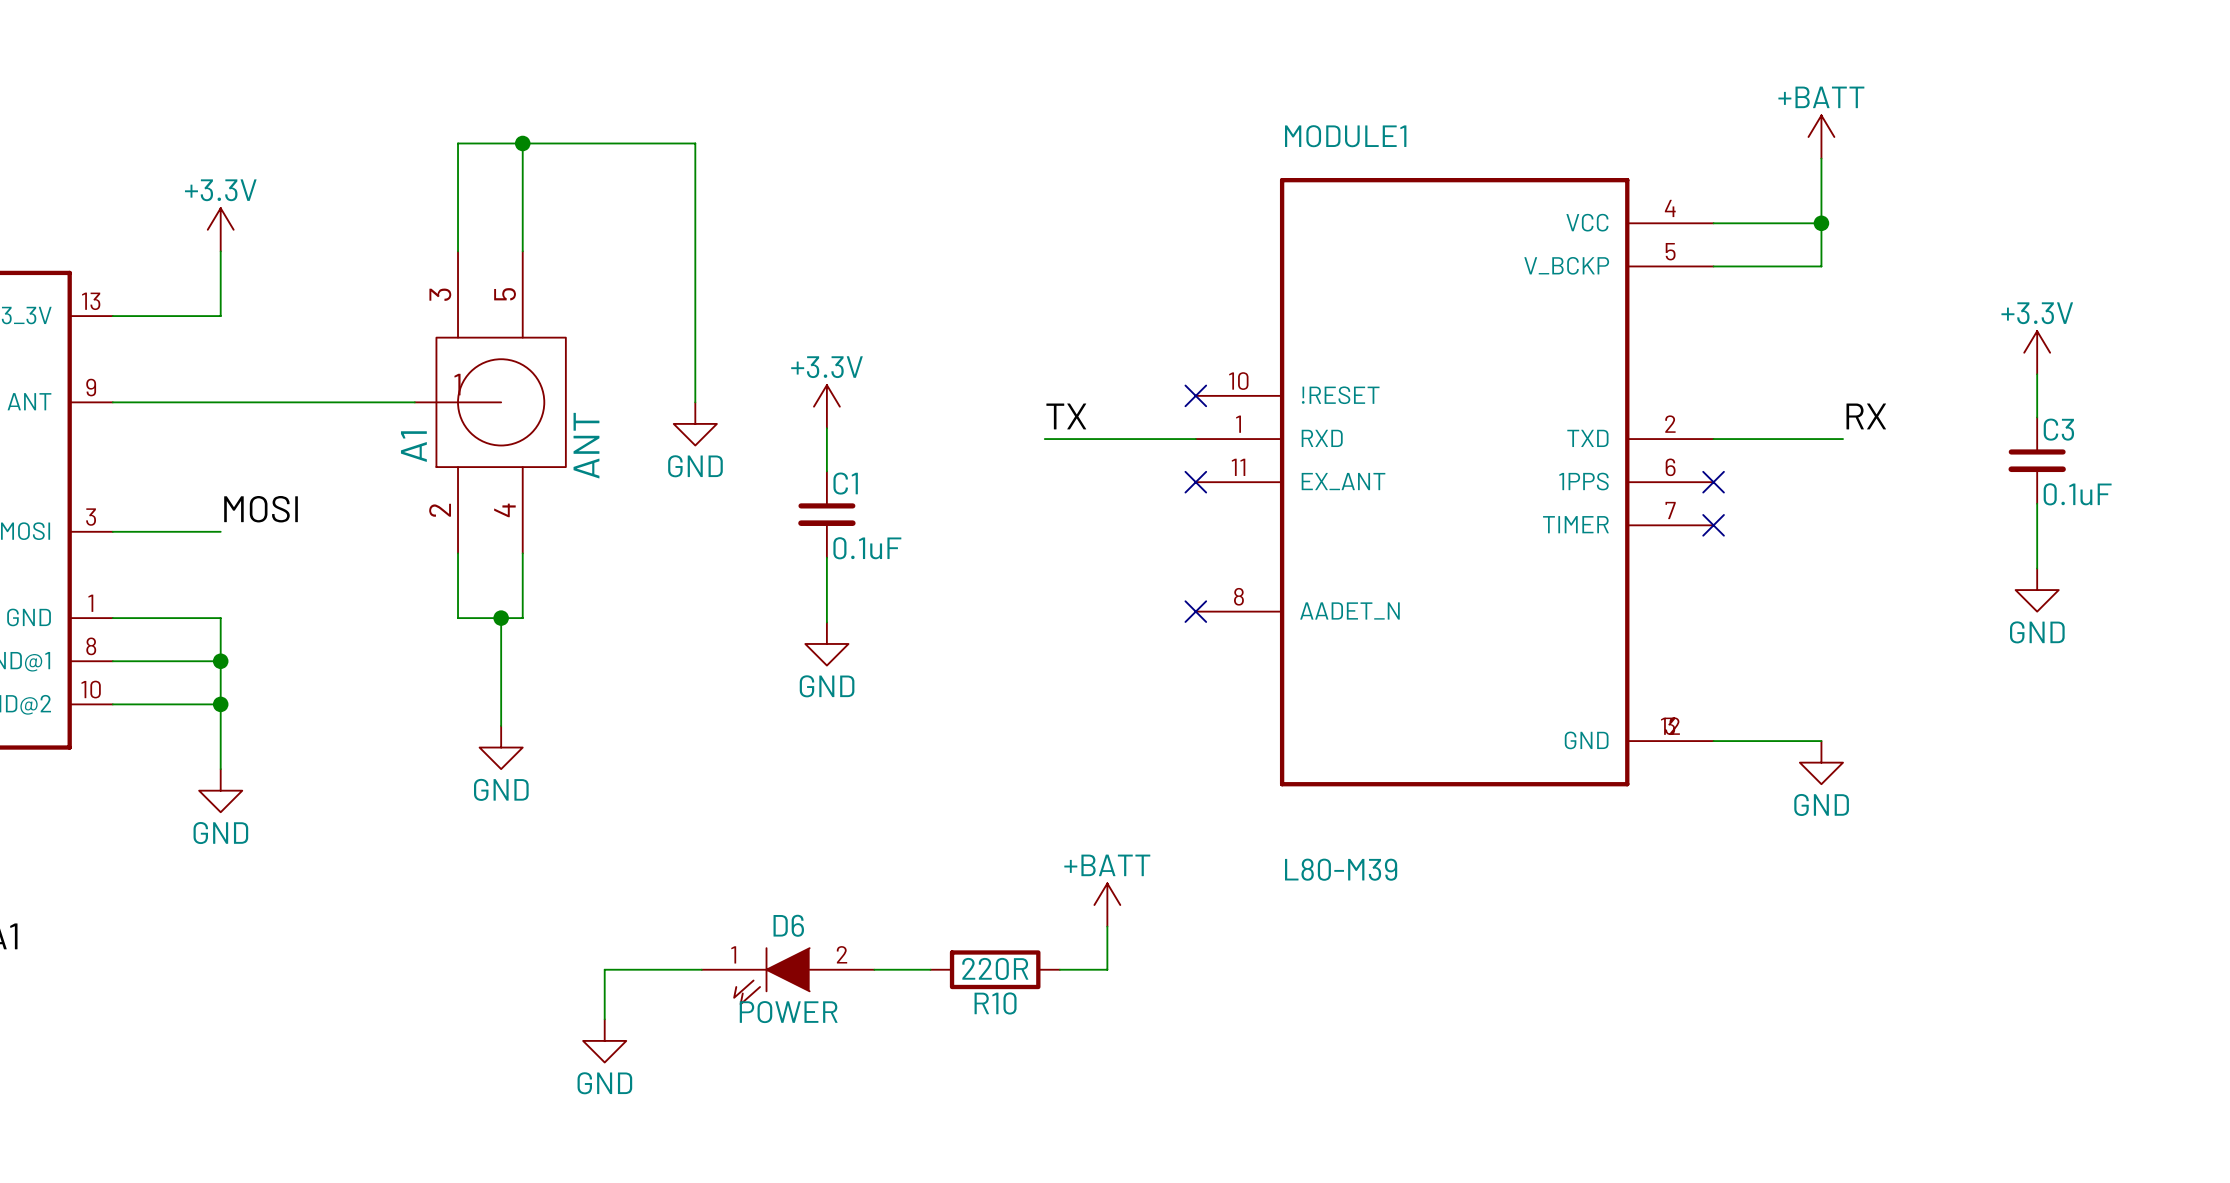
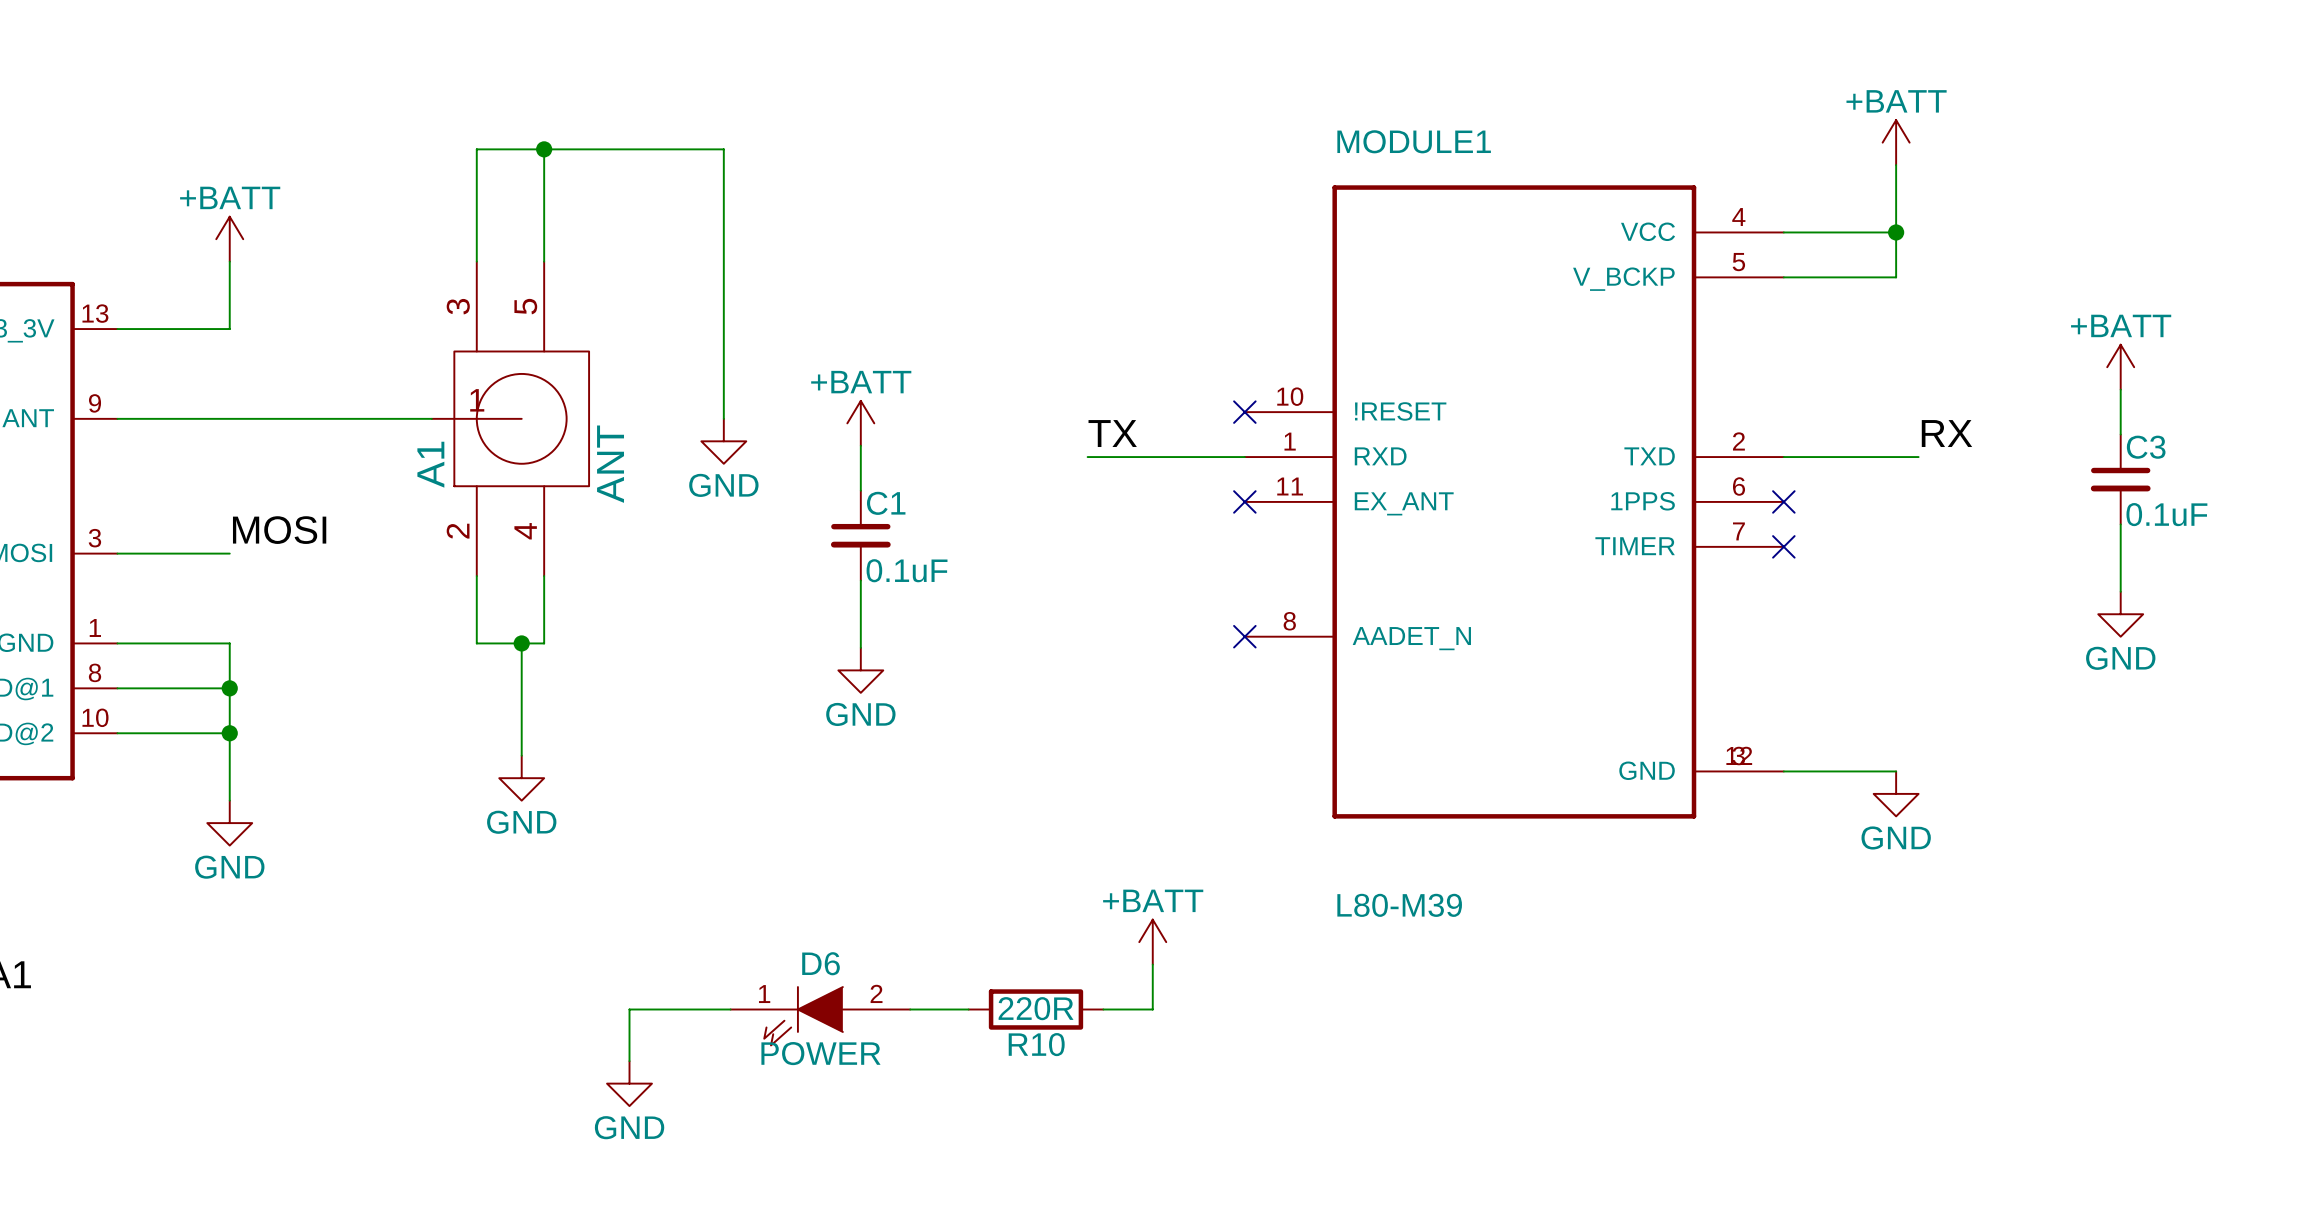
power symbol: +3.3V (220, 229) -> +BATT (229, 239)
power symbol: +3.3V (2037, 352) -> +BATT (2120, 367)
power symbol: +3.3V (826, 406) -> +BATT (860, 423)

